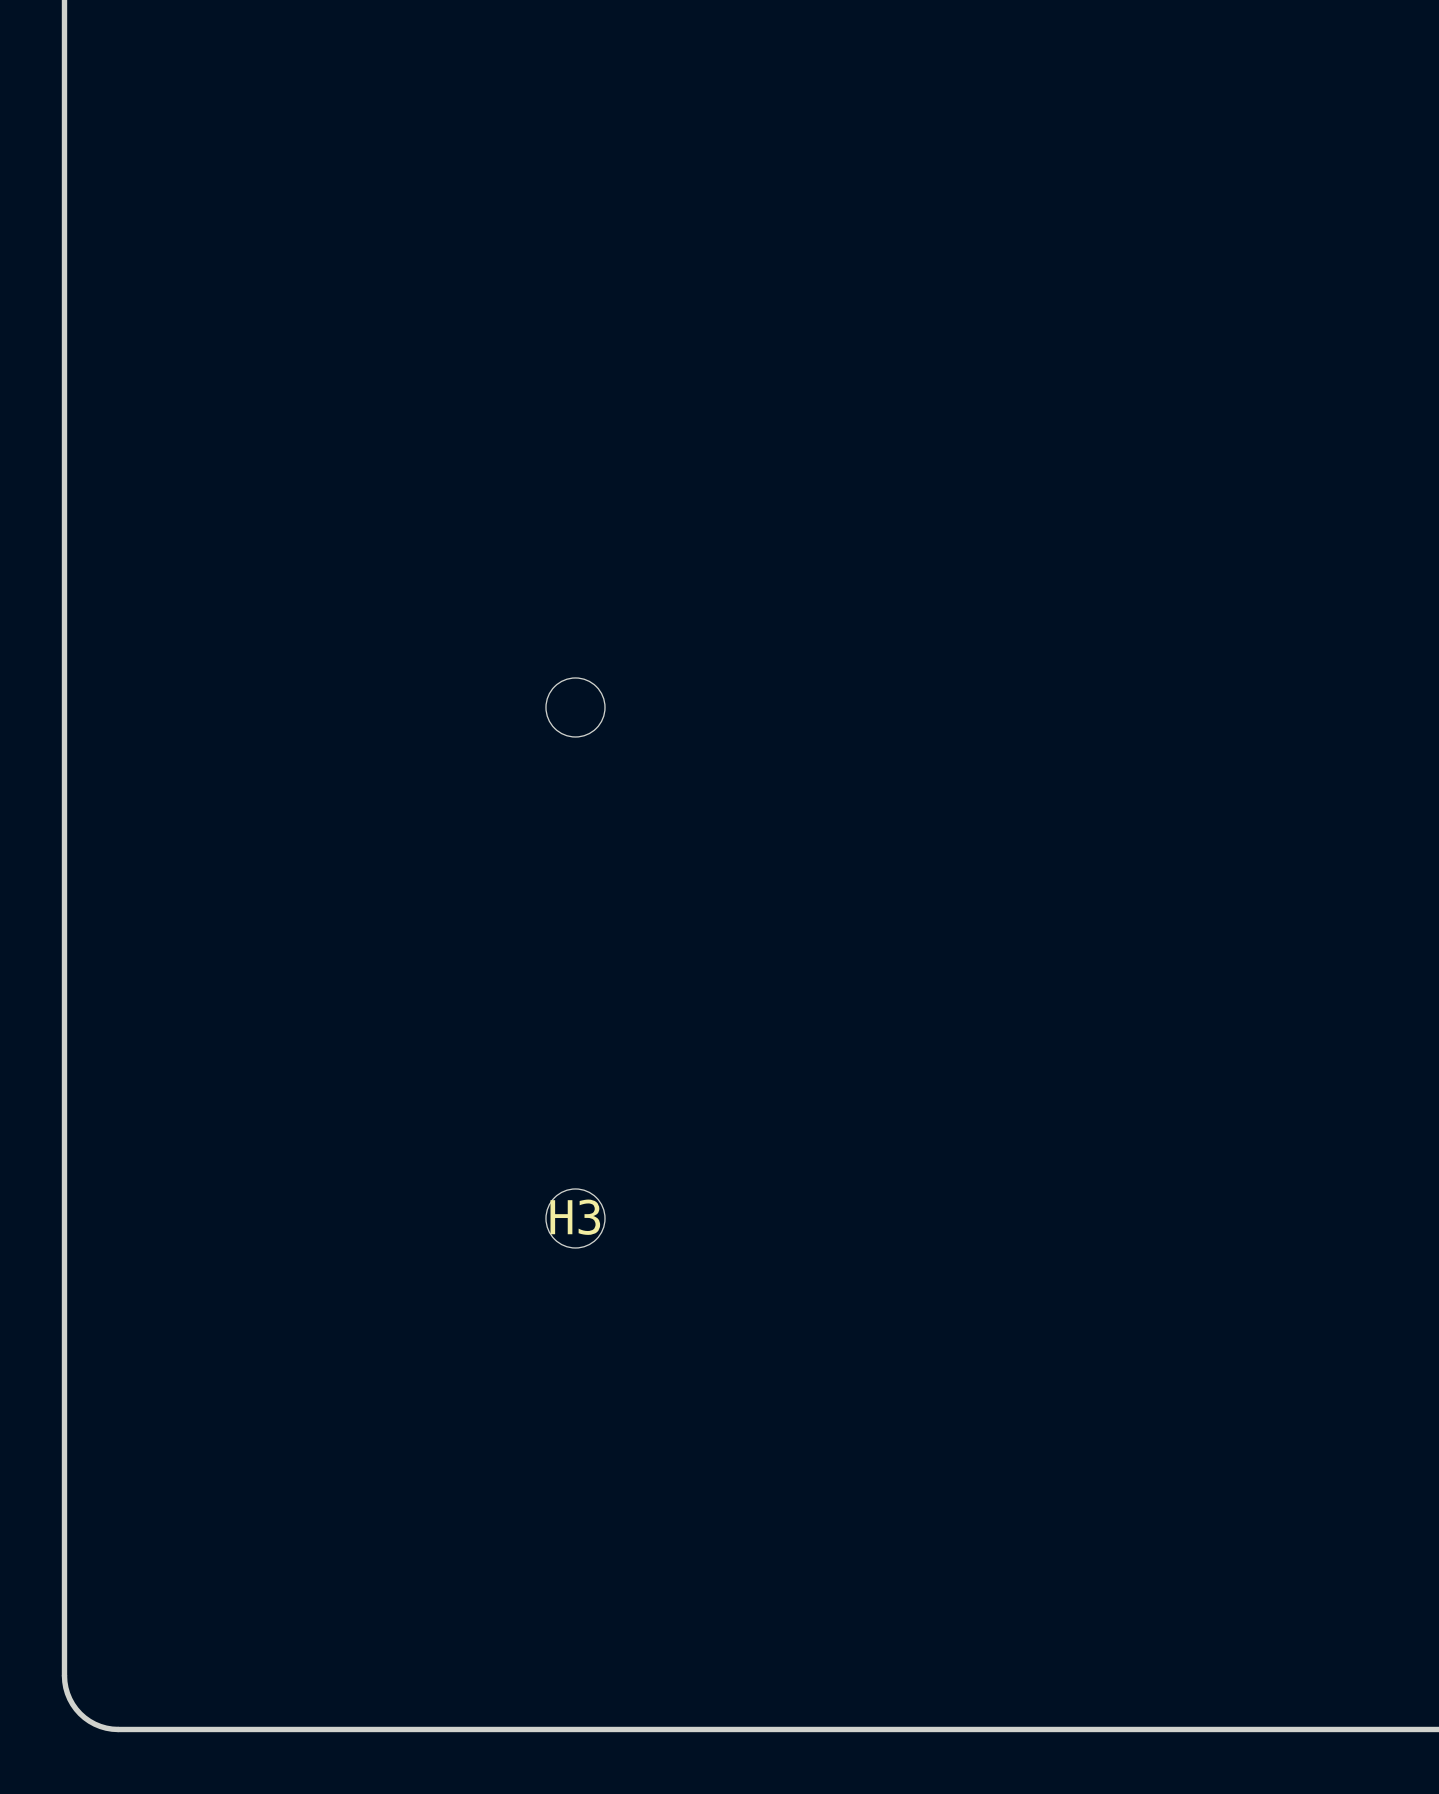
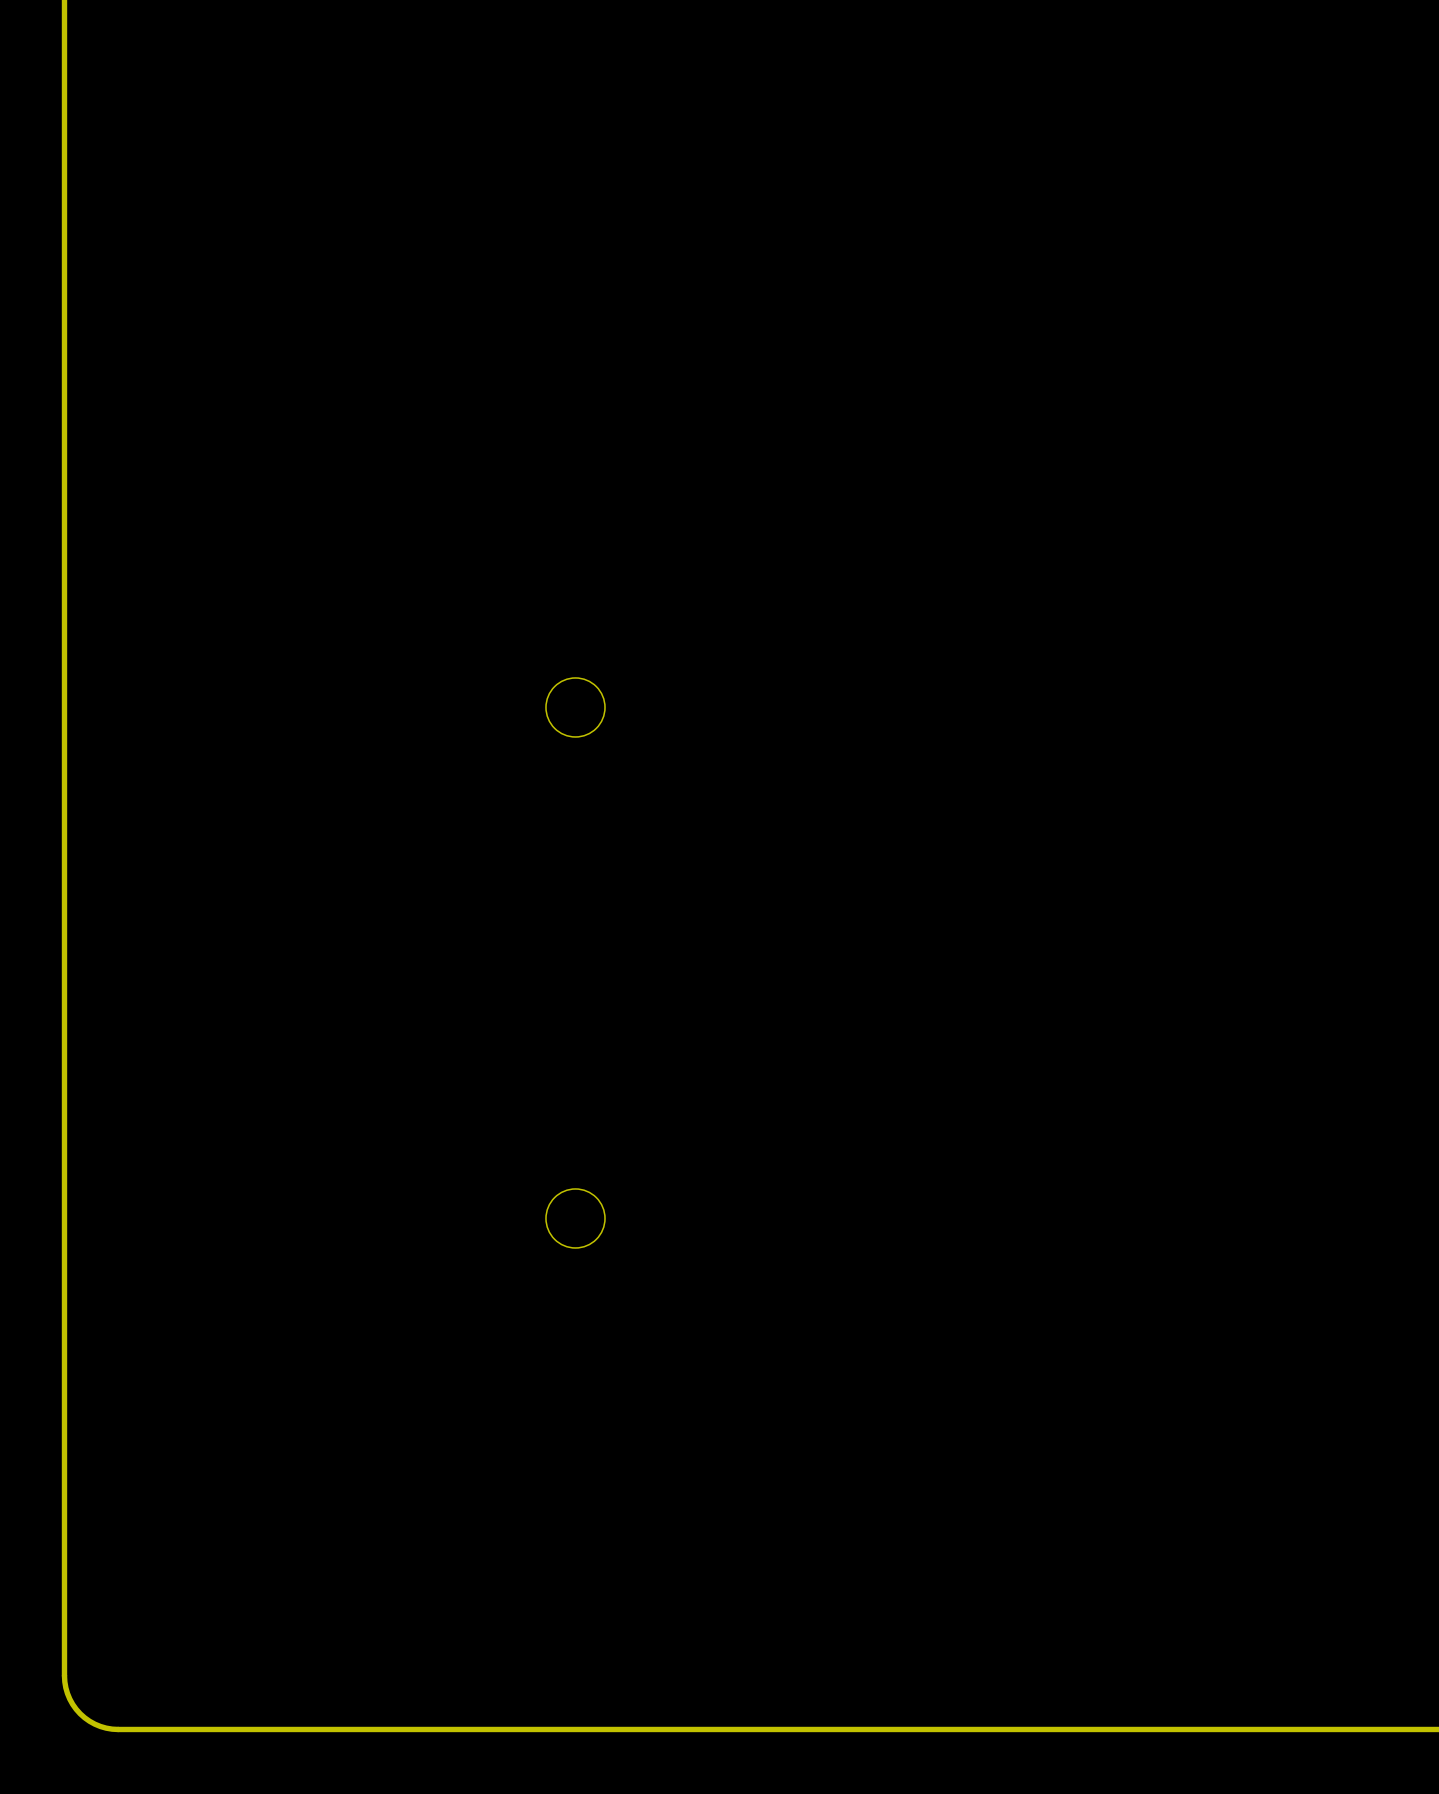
H3 name: H3 (575, 1217) -> none

